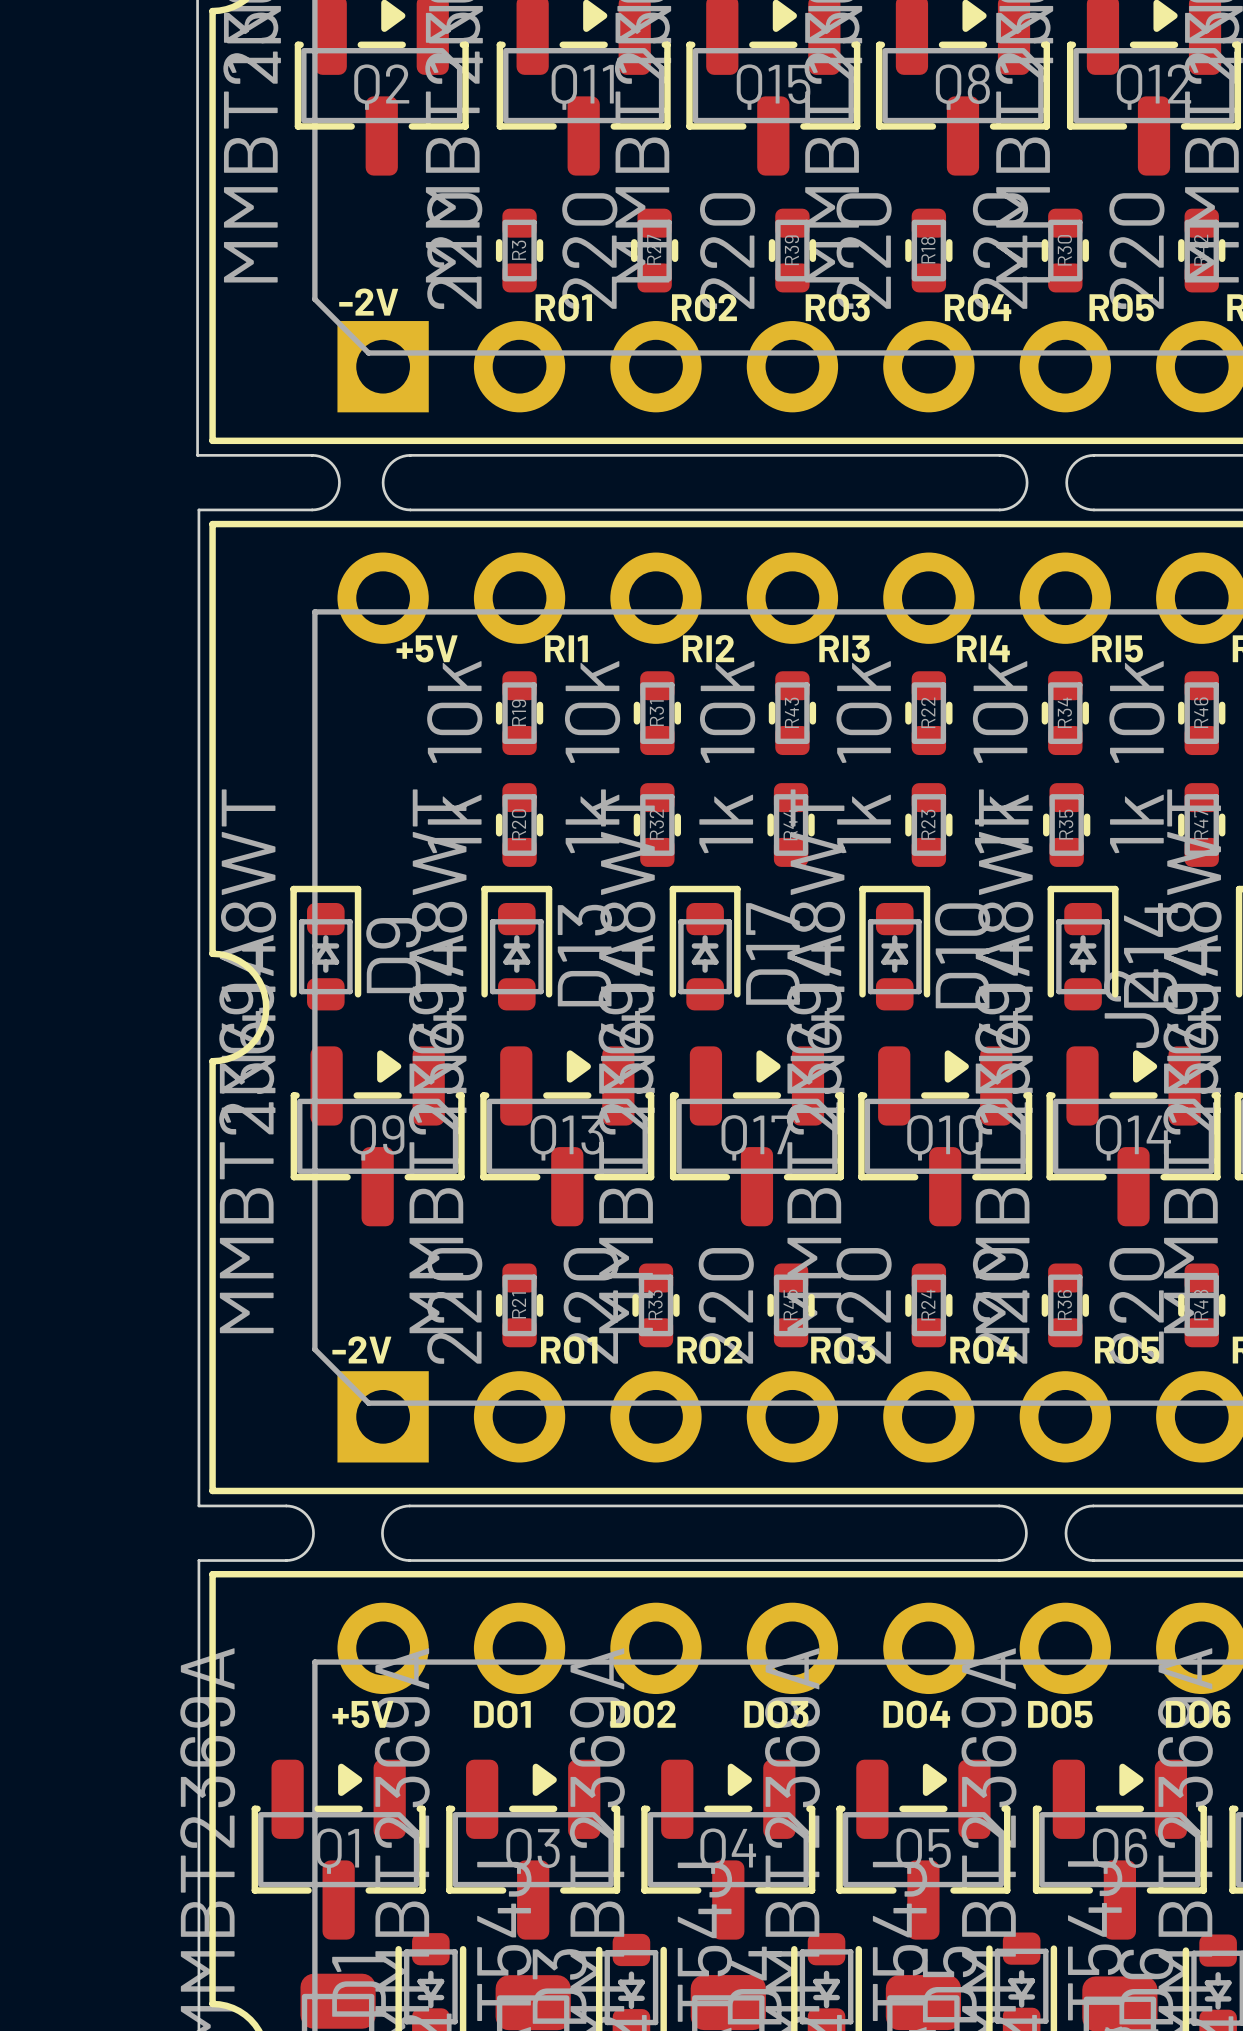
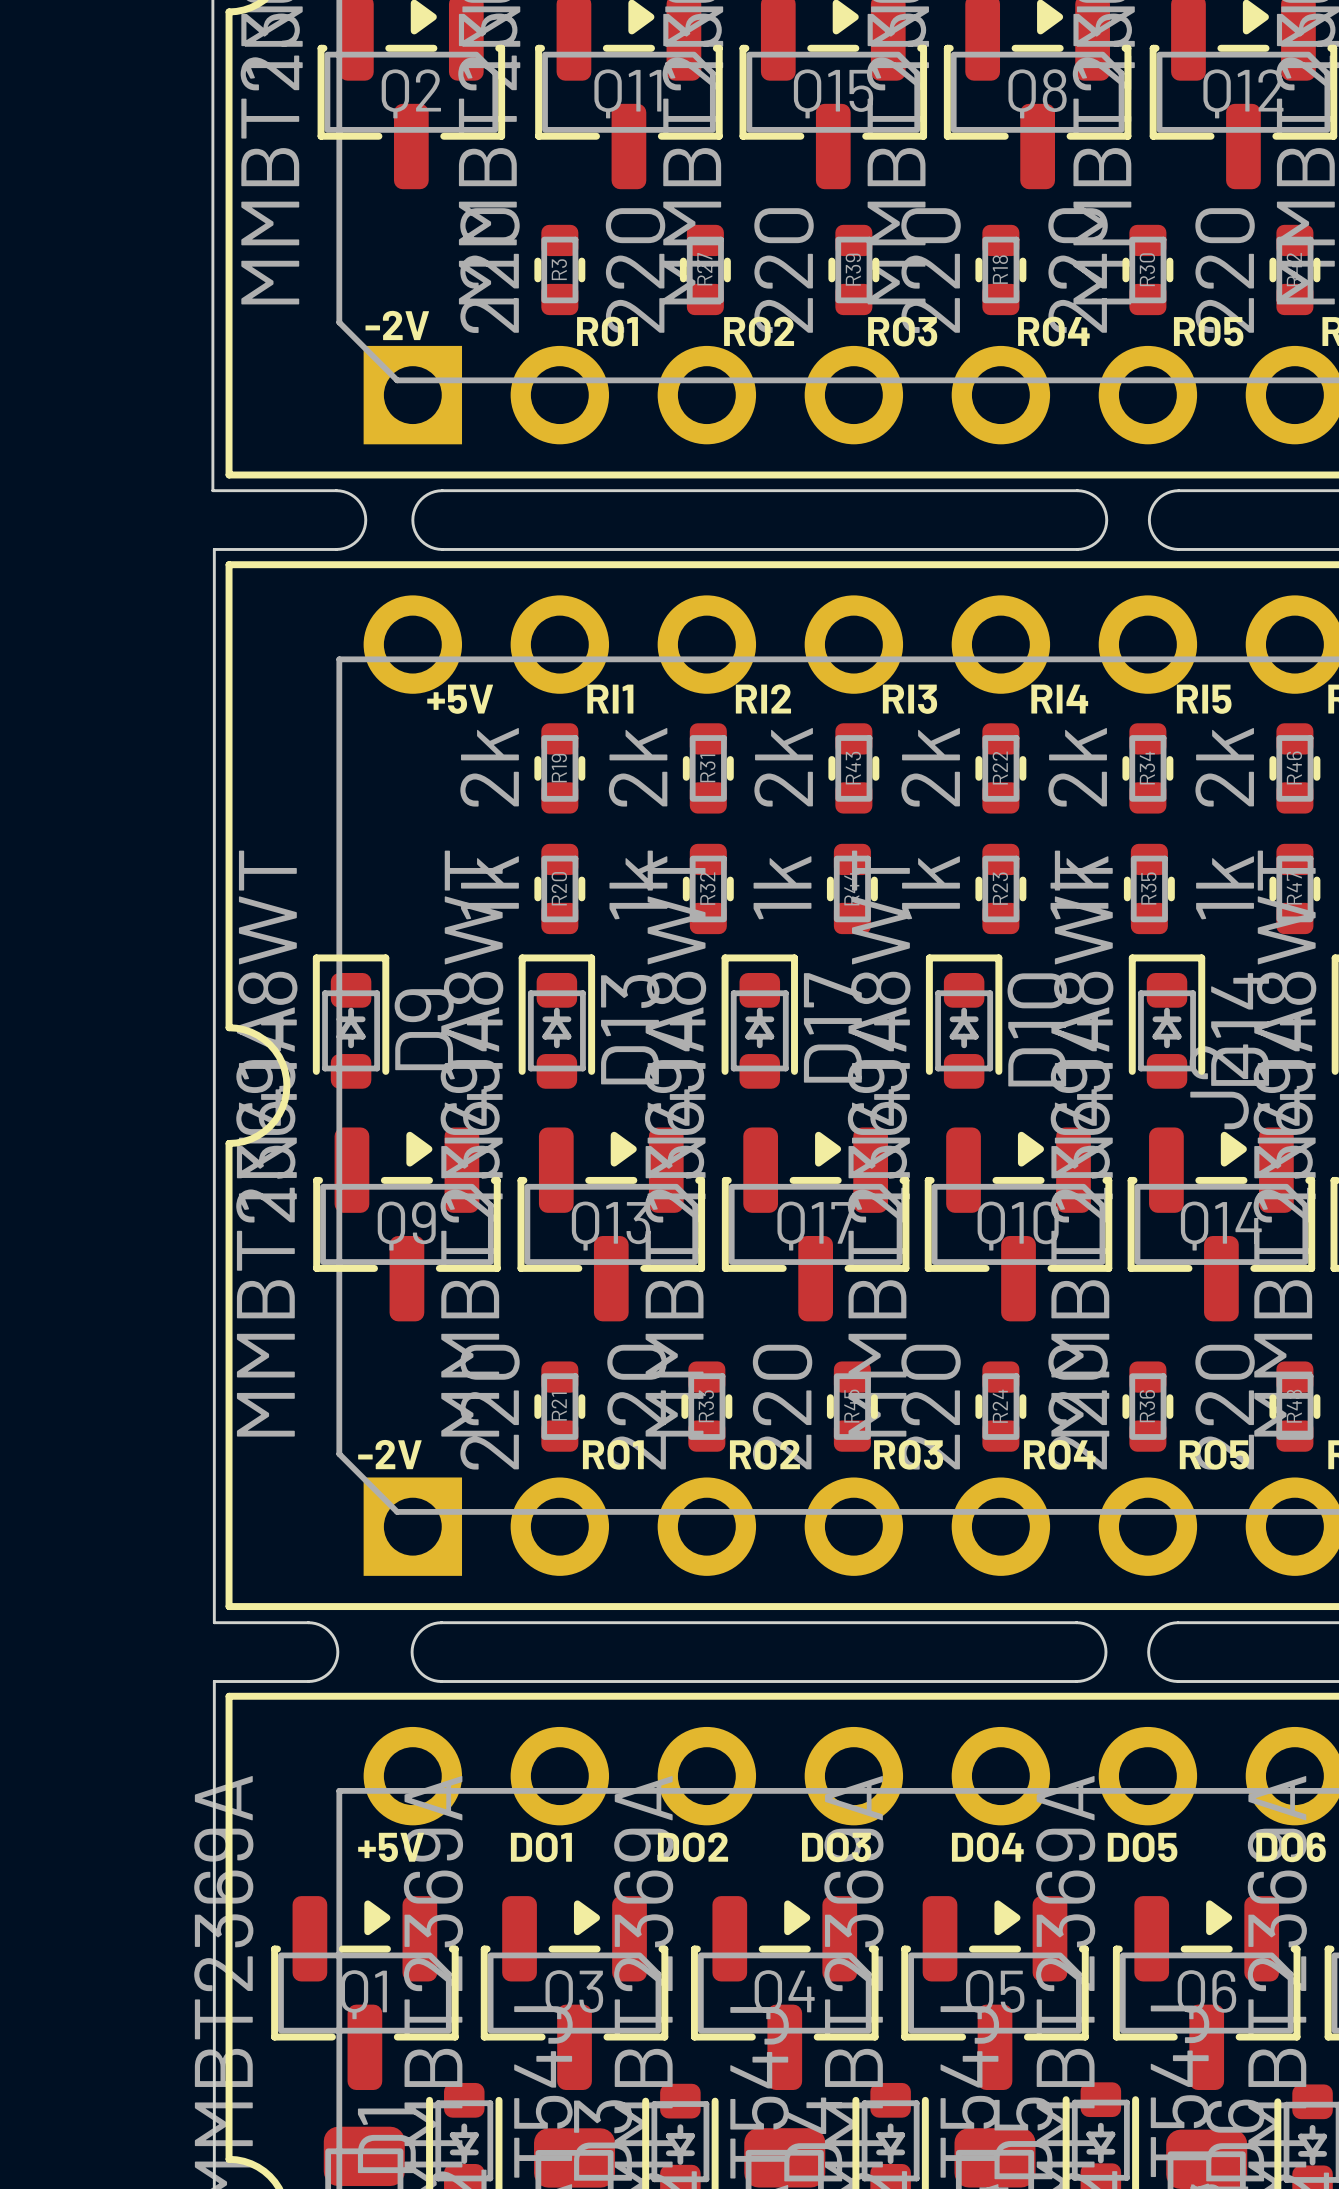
R19 value: 10k (454, 712) -> 2k (489, 767)
R31 value: 10k (592, 712) -> 2k (638, 767)
R43 value: 10k (727, 712) -> 2k (783, 767)
R22 value: 10k (864, 712) -> 2k (930, 767)
R34 value: 10k (1000, 712) -> 2k (1077, 767)
R46 value: 10k (1136, 712) -> 2k (1224, 767)

